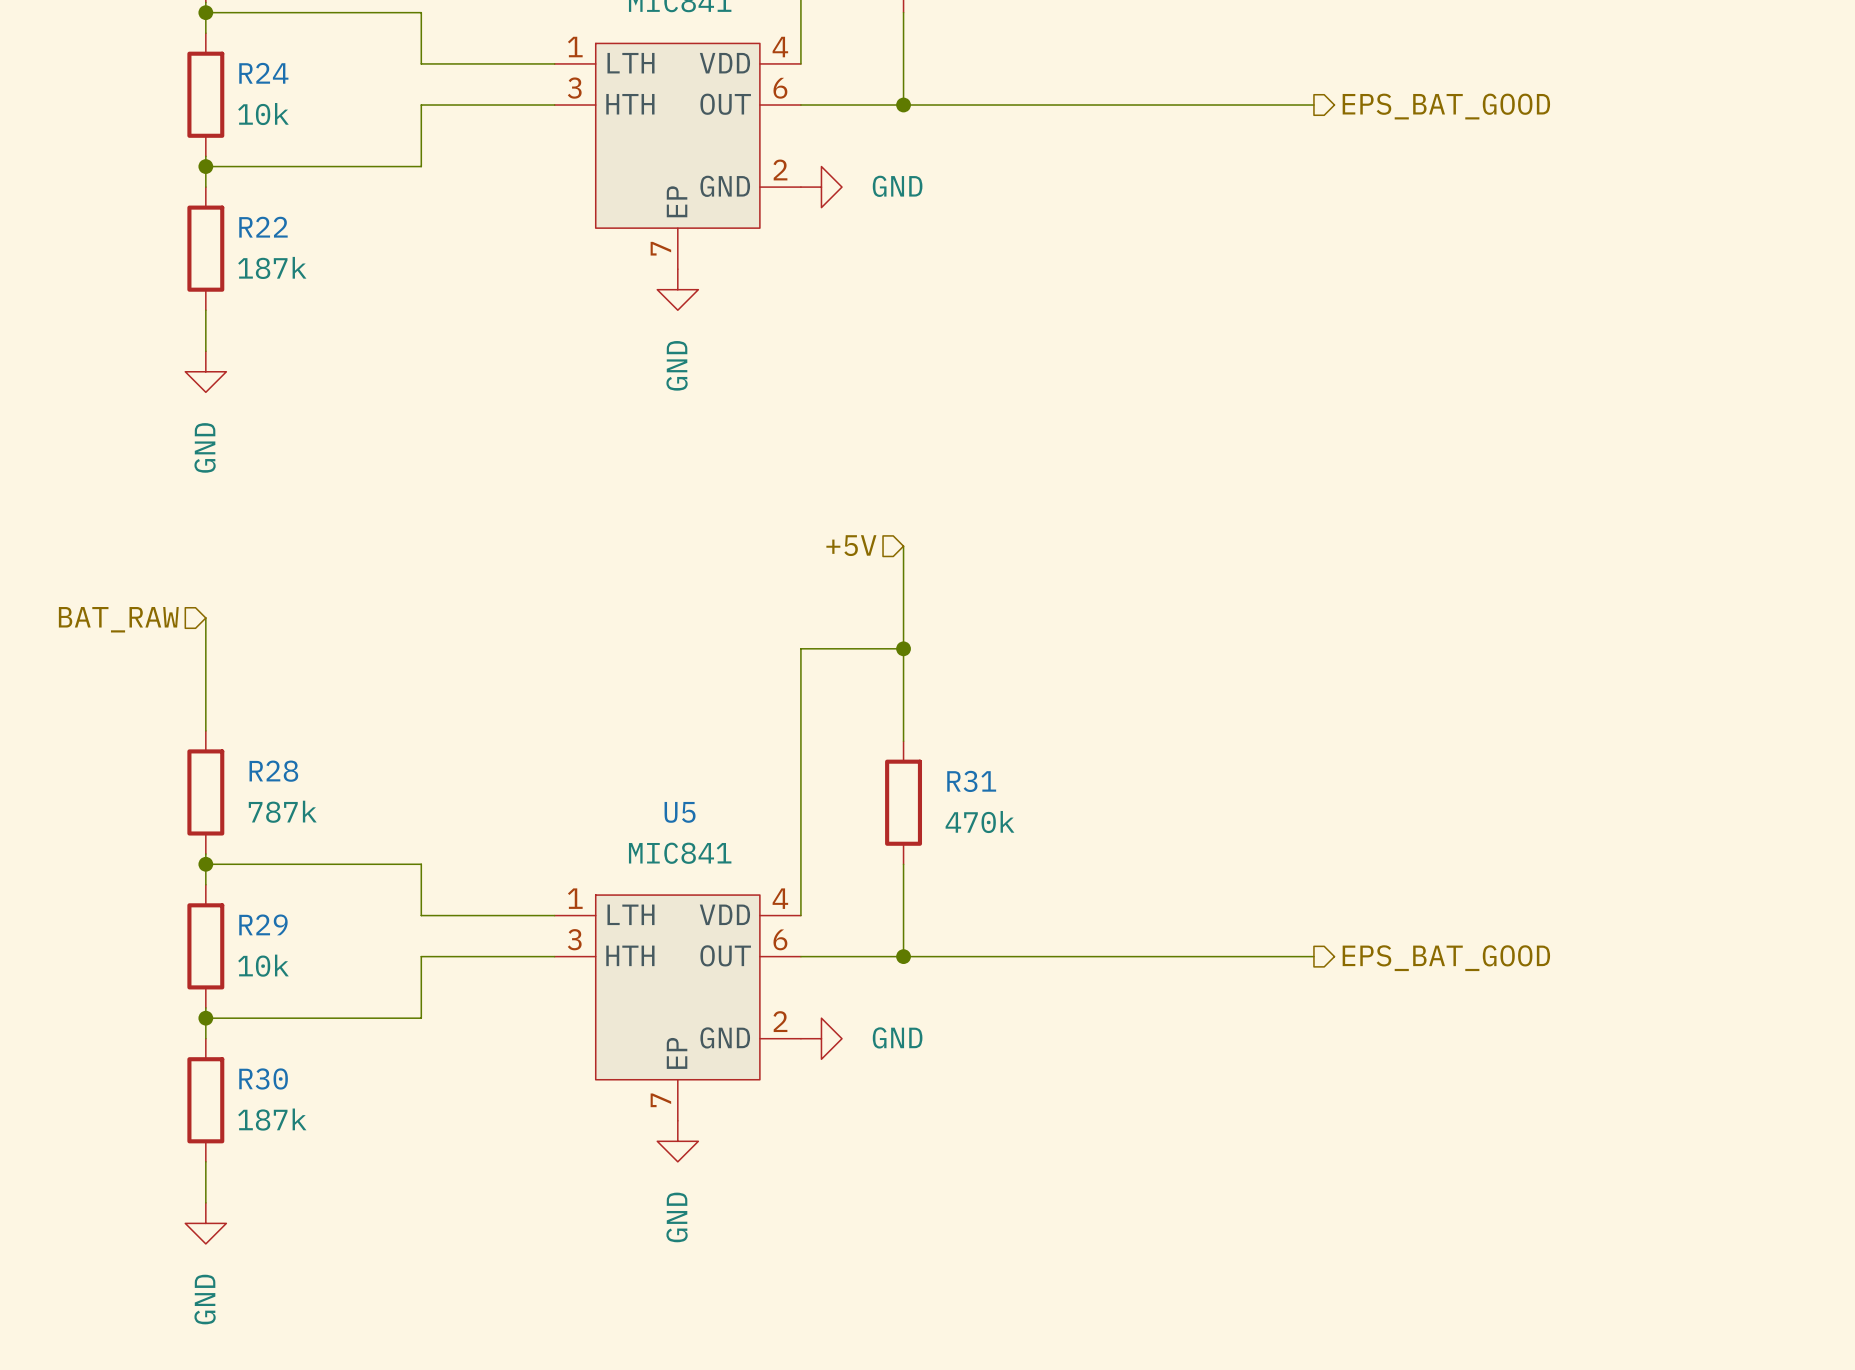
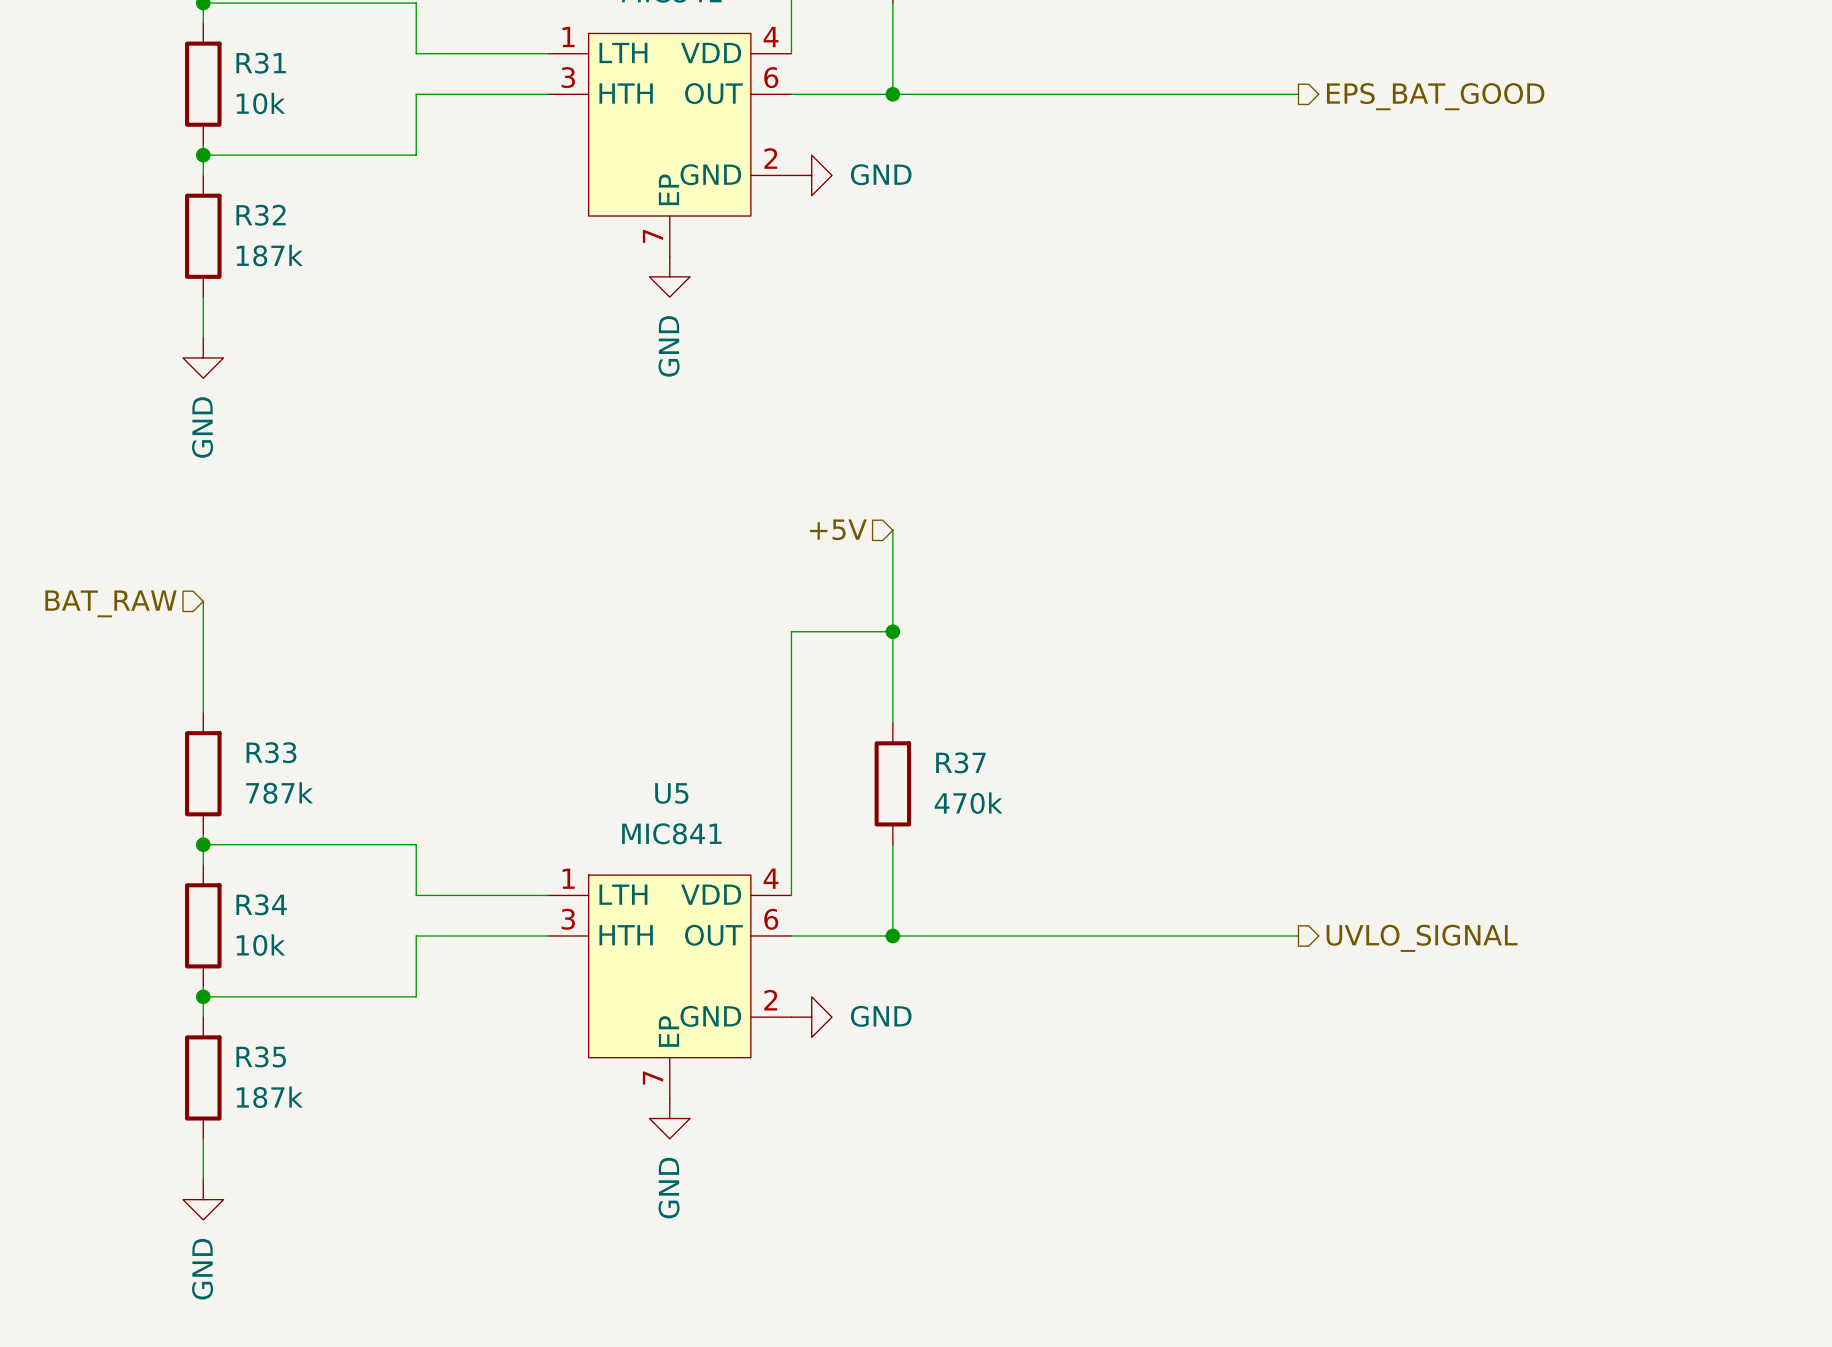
R24 name: R24 (263, 73) -> R31 (261, 63)
R22 name: R22 (263, 227) -> R32 (261, 215)
R28 name: R28 (273, 771) -> R33 (271, 752)
R31 name: R31 (971, 781) -> R37 (960, 762)
R29 name: R29 (263, 924) -> R34 (261, 904)
hierarchical label: EPS_BAT_GOOD (1446, 958) -> UVLO_SIGNAL (1422, 938)
R30 name: R30 (263, 1078) -> R35 (261, 1056)

